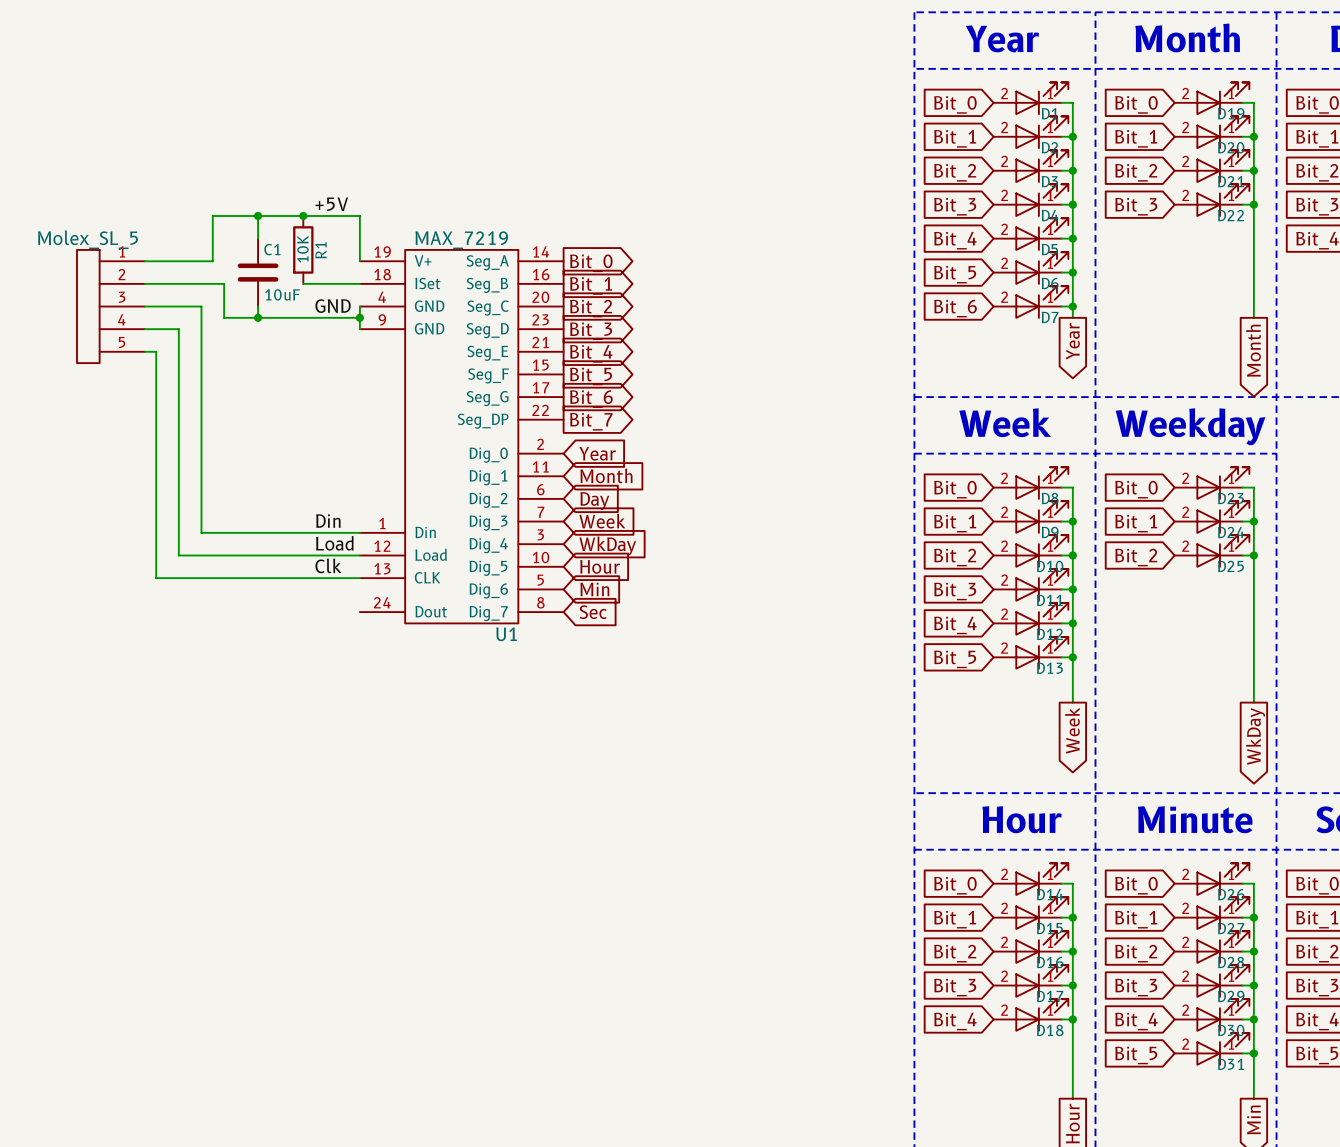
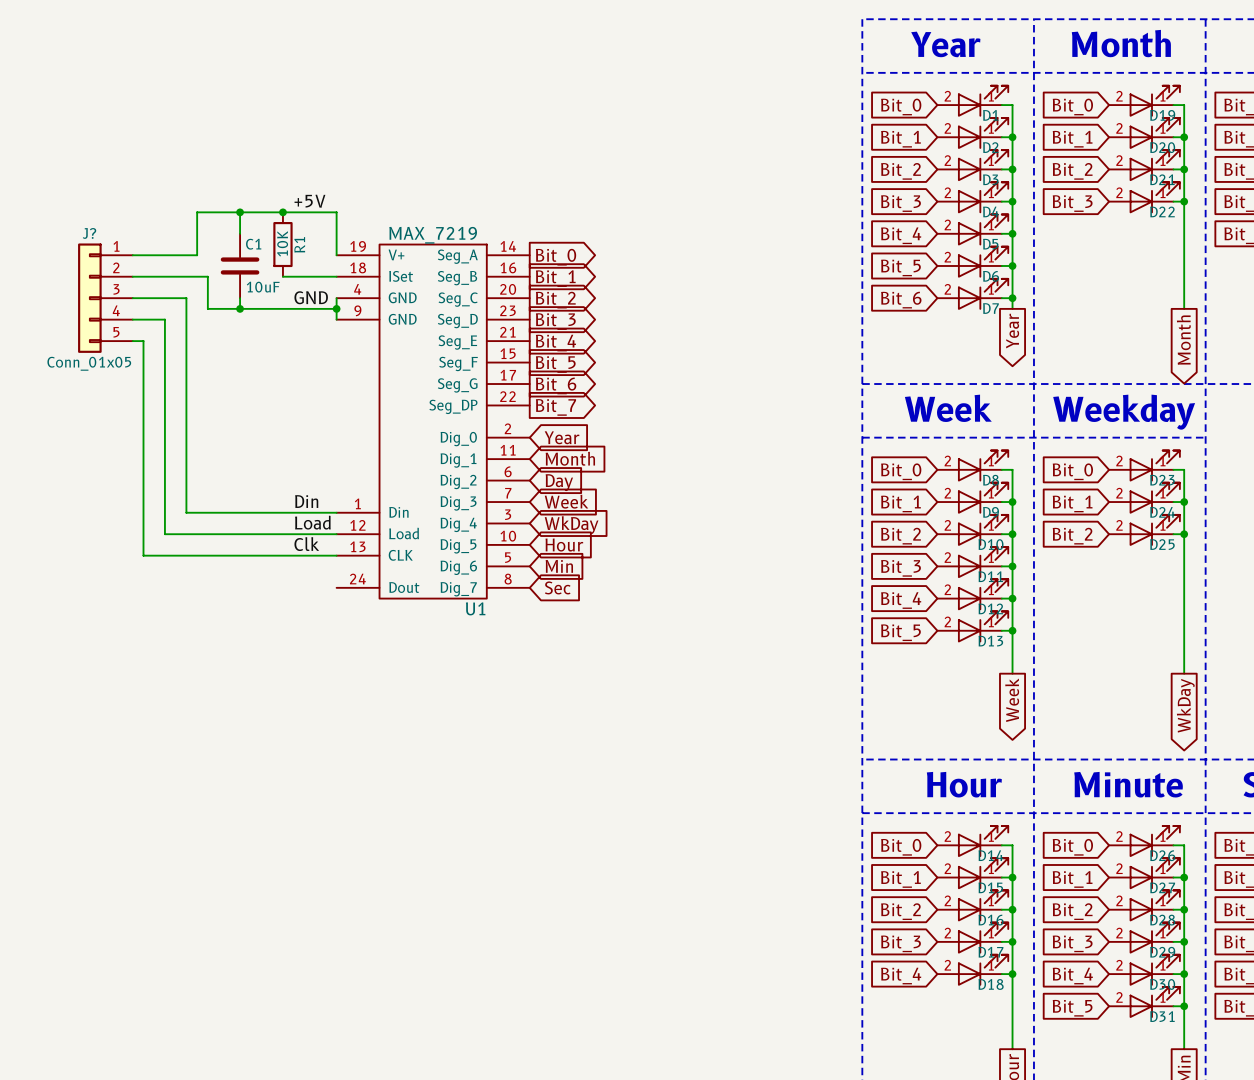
part: Molex_SL_5 (110, 306) -> none
J?: none -> Conn_01x05 (105, 298)

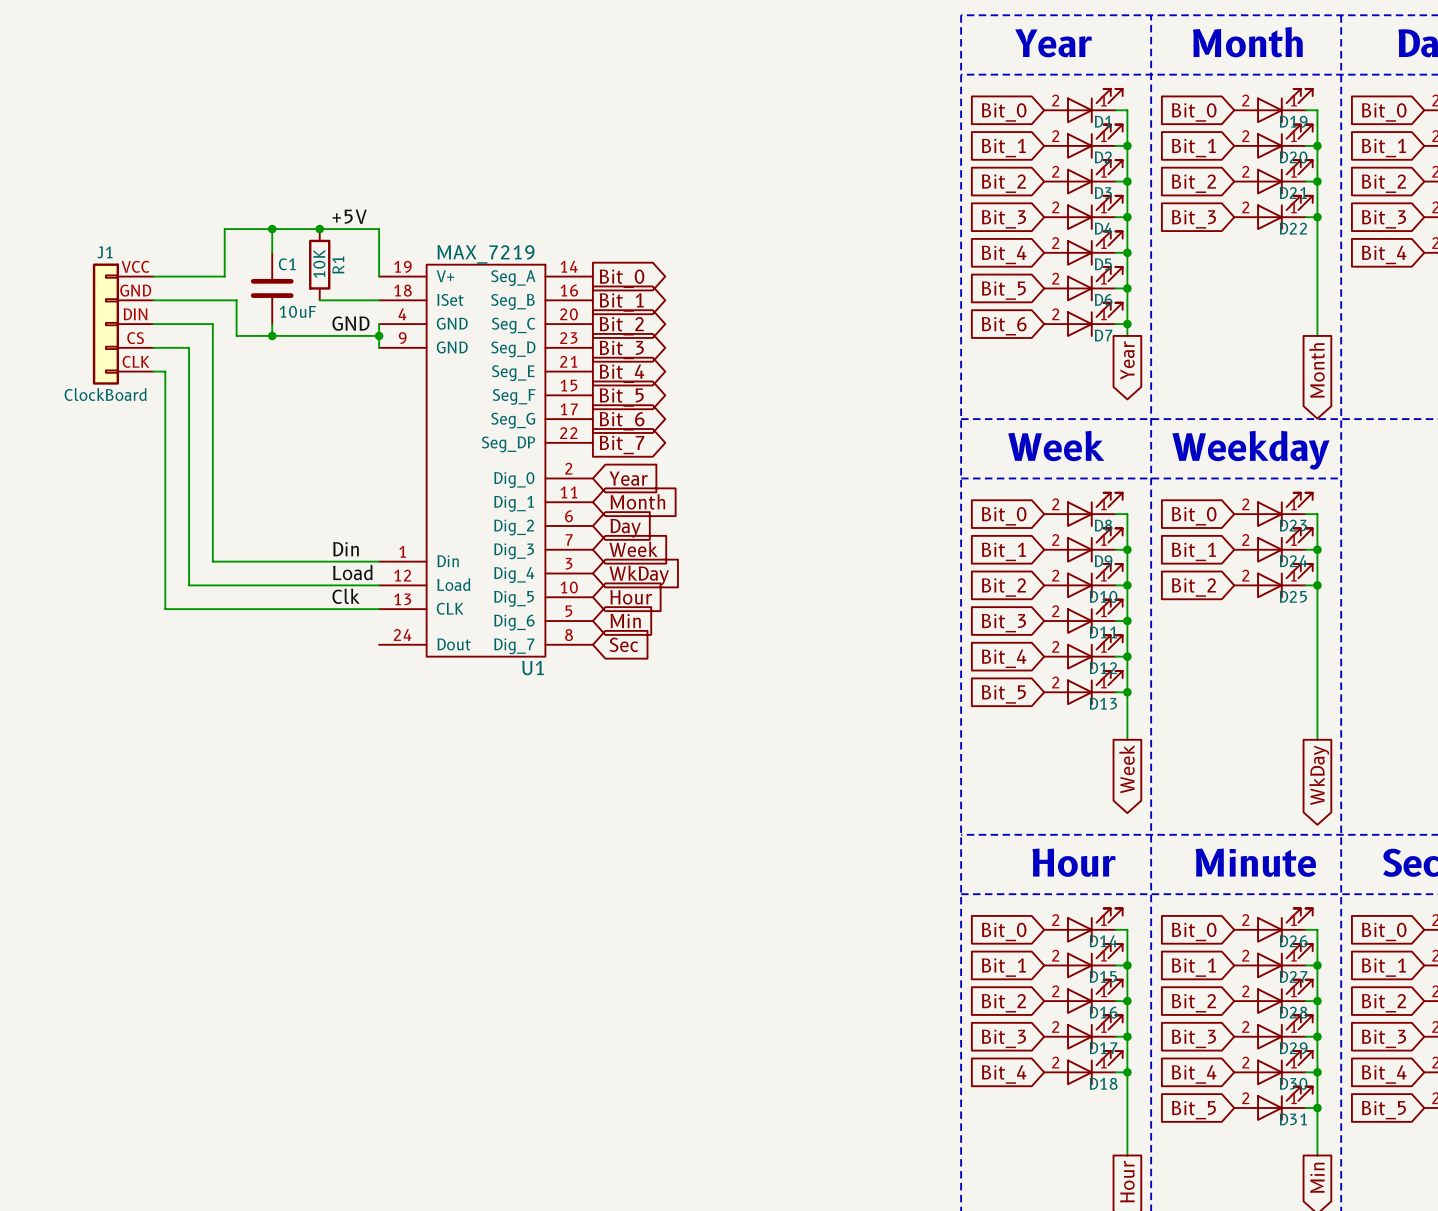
J? name: J? (89, 233) -> J1 (104, 252)
J? pin number: 1 (116, 246) -> VCC (135, 266)
J? pin number: 2 (116, 267) -> GND (135, 290)
J? pin number: 3 (116, 289) -> DIN (135, 314)
J? pin number: 4 (116, 310) -> CS (135, 338)
J? pin number: 5 (116, 332) -> CLK (135, 361)
J? value: Conn_01x05 (89, 363) -> ClockBoard (105, 394)

